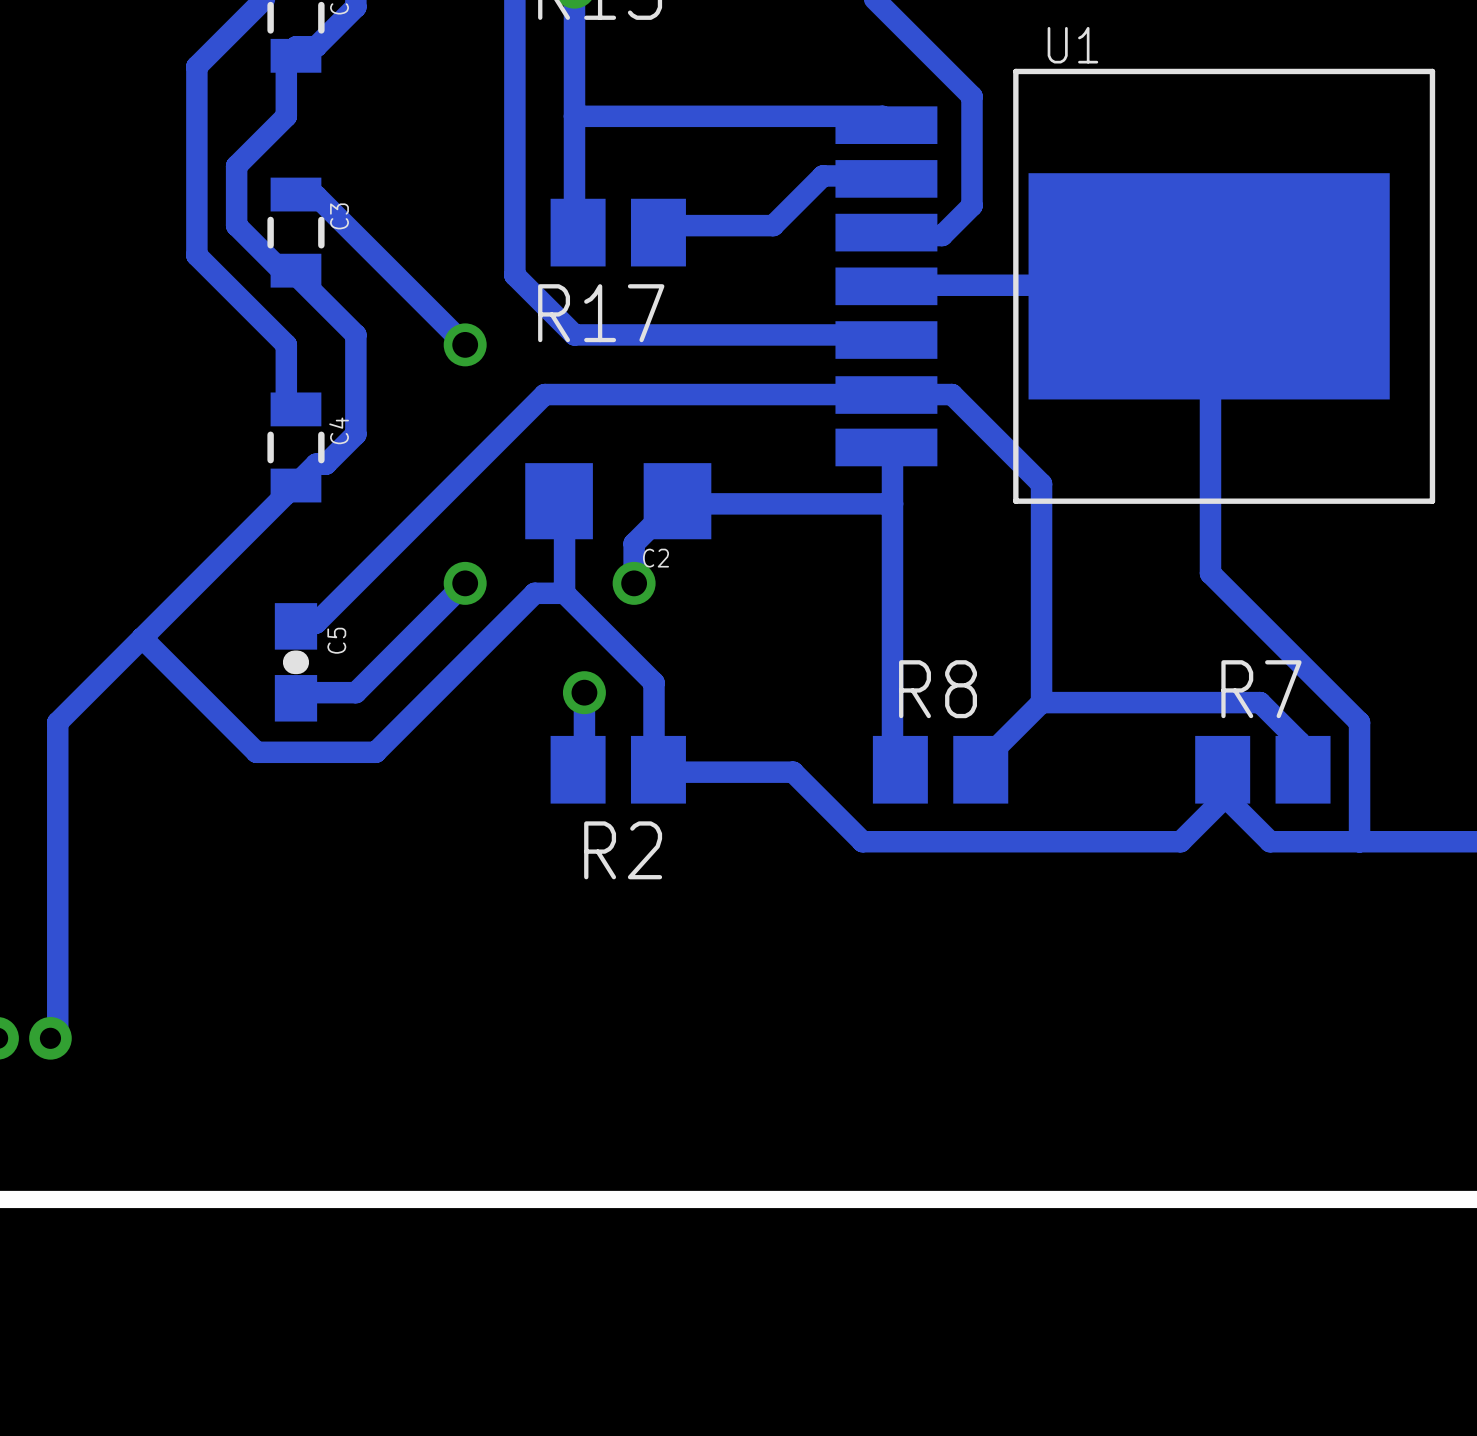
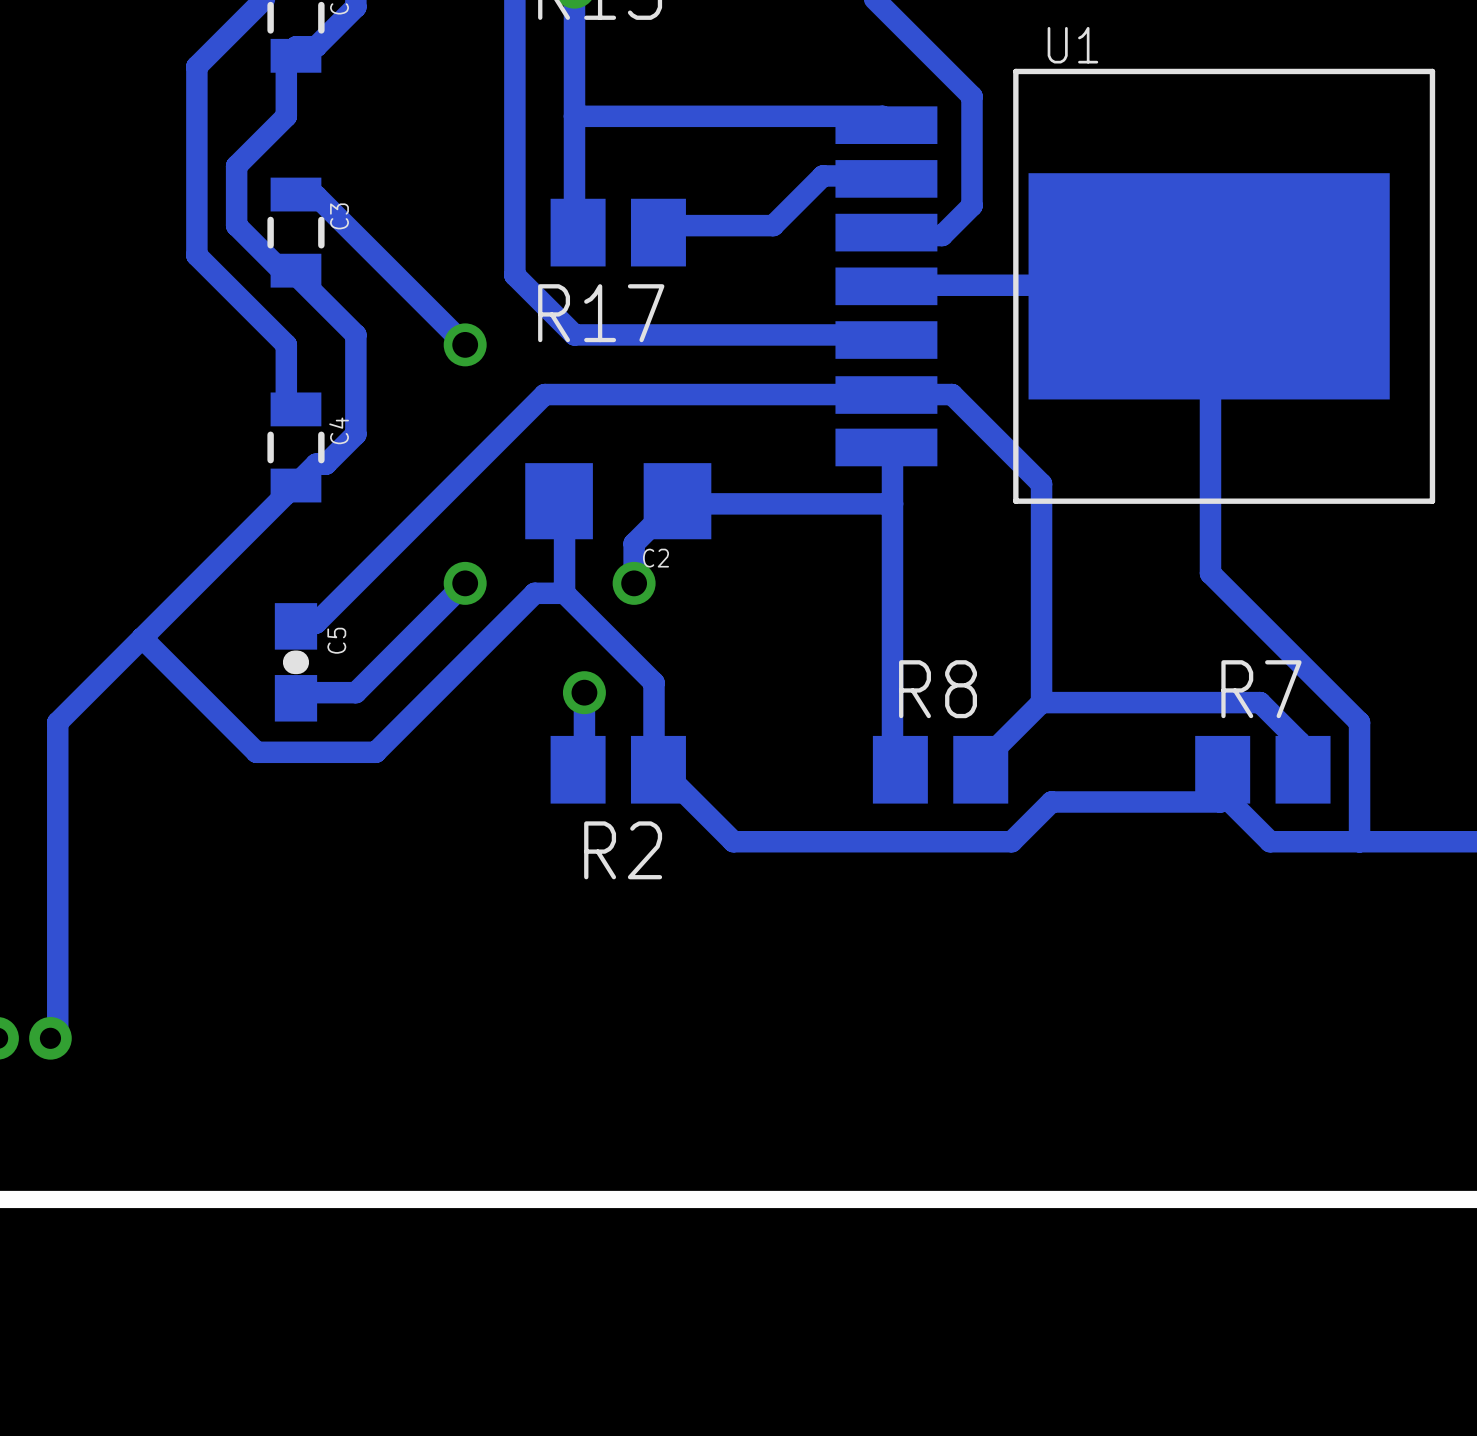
track: (663, 772) (793, 772) (862, 841) -> (663, 772) (733, 841) (862, 841)
track: (1220, 801) (1180, 841) (1011, 841) -> (1220, 801) (1051, 801) (1011, 841)

